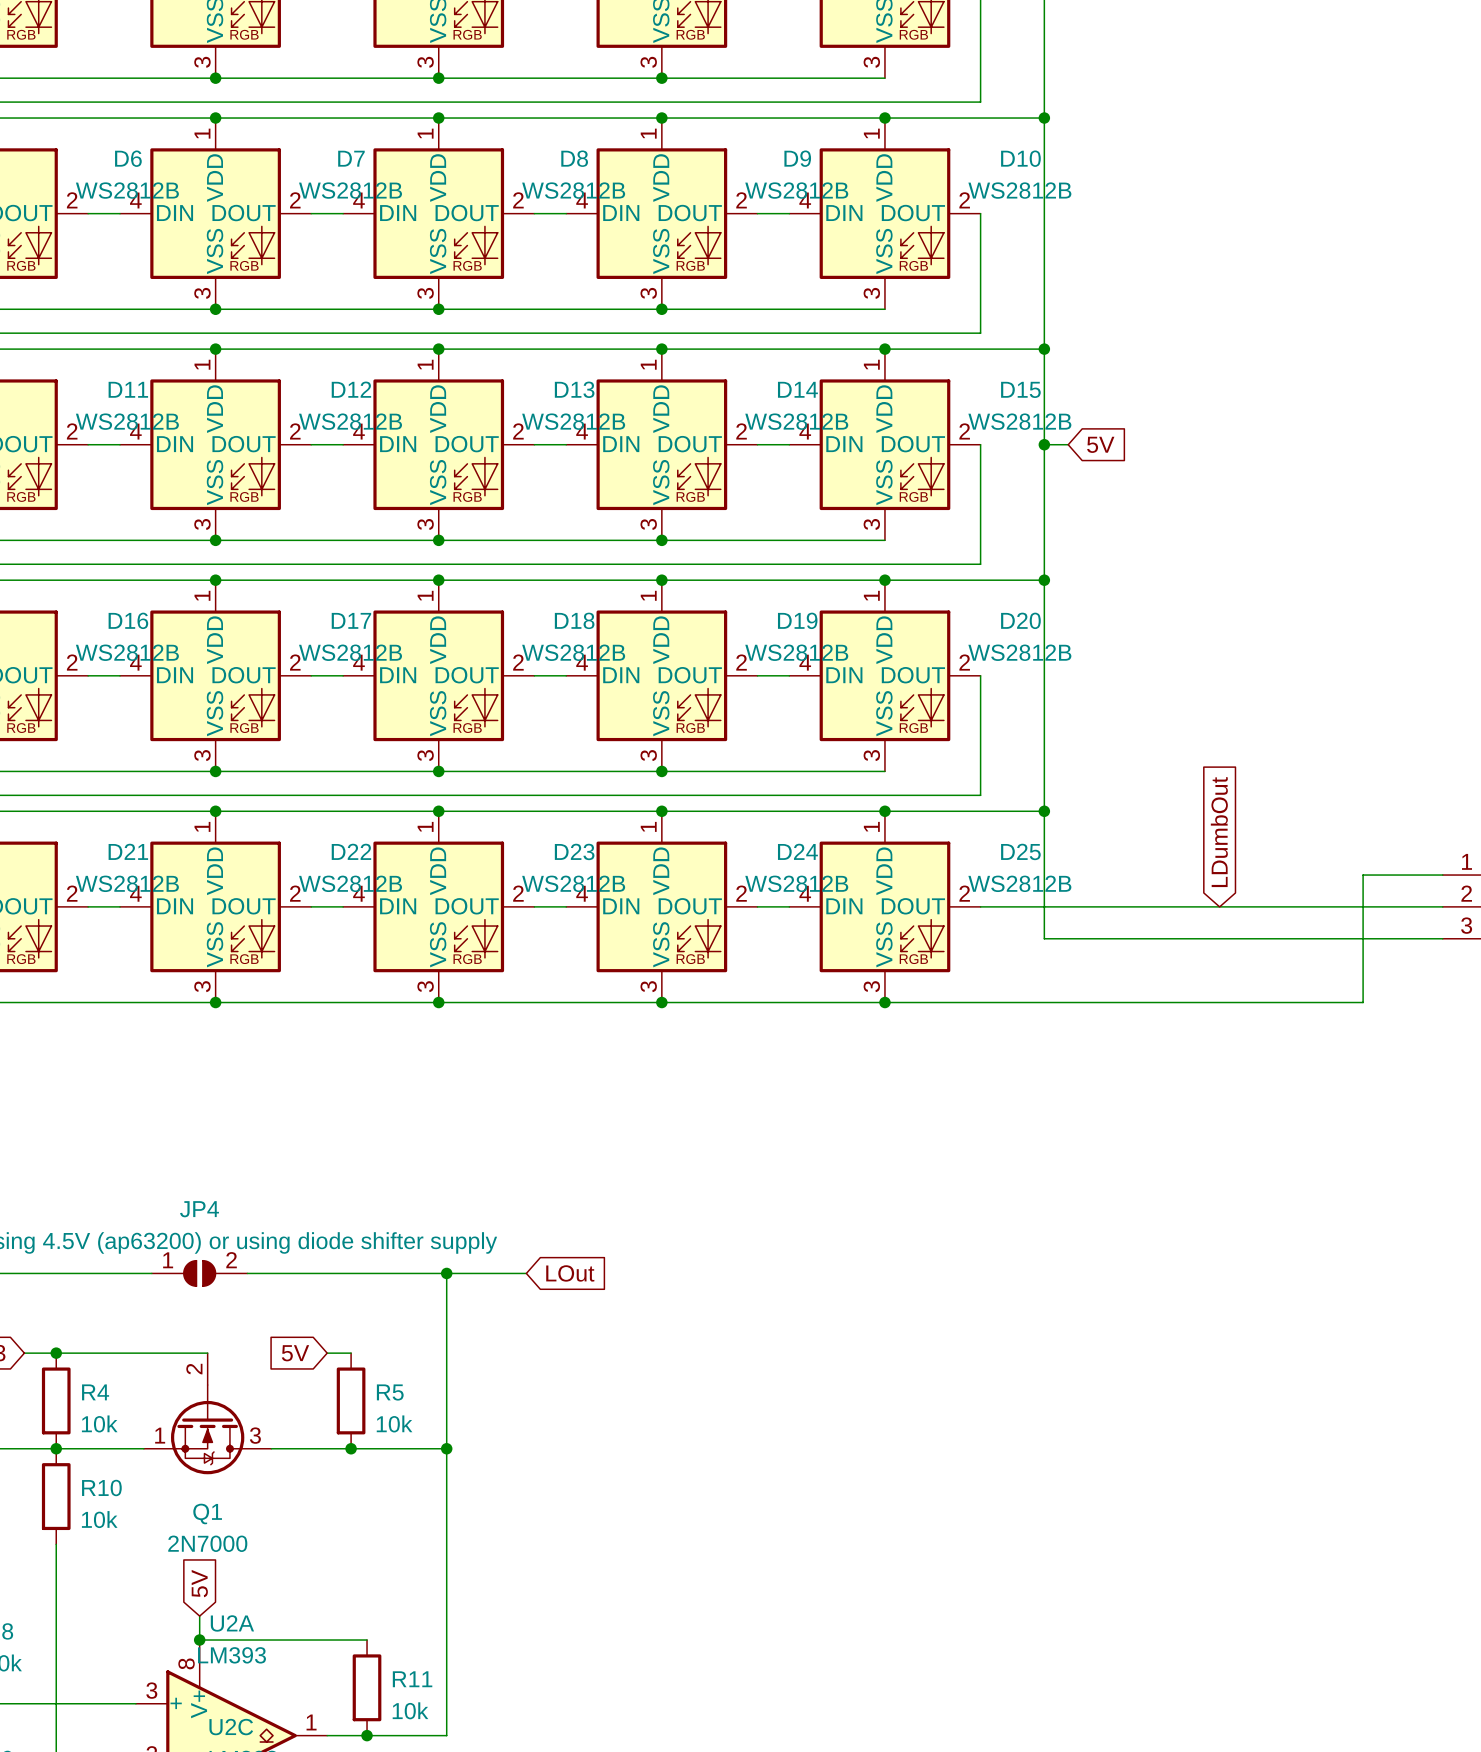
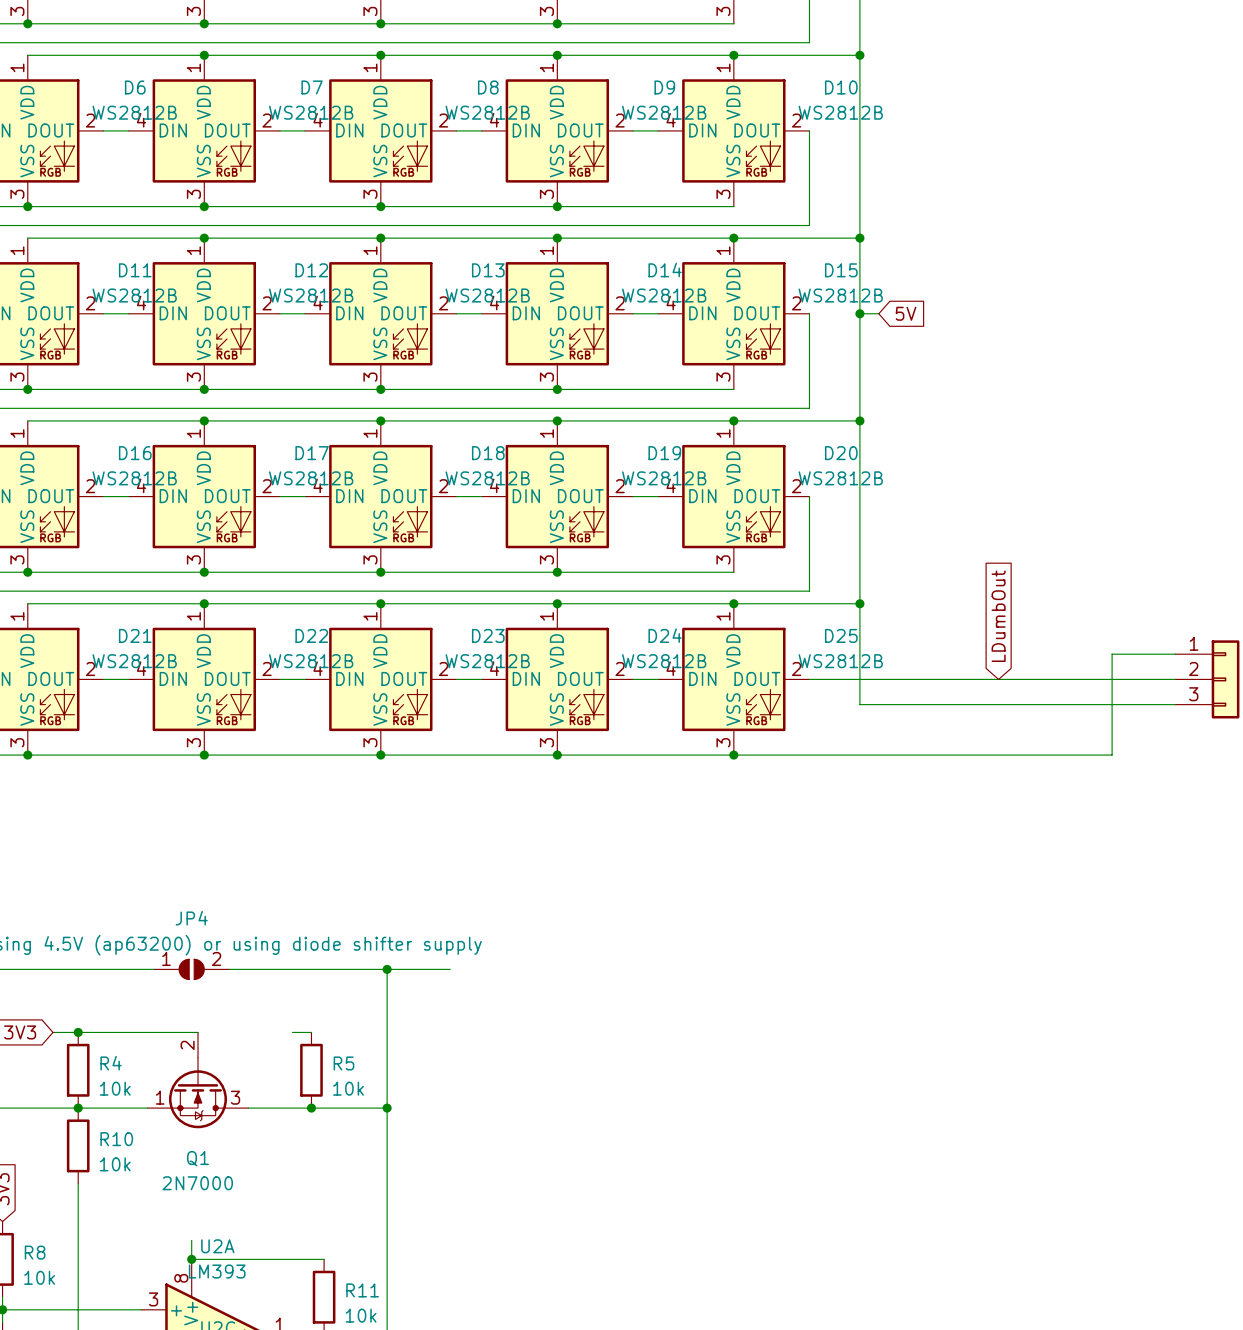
global label: LOut (570, 1273) -> none
global label: 5V (295, 1353) -> none
global label: 5V (199, 1583) -> none

